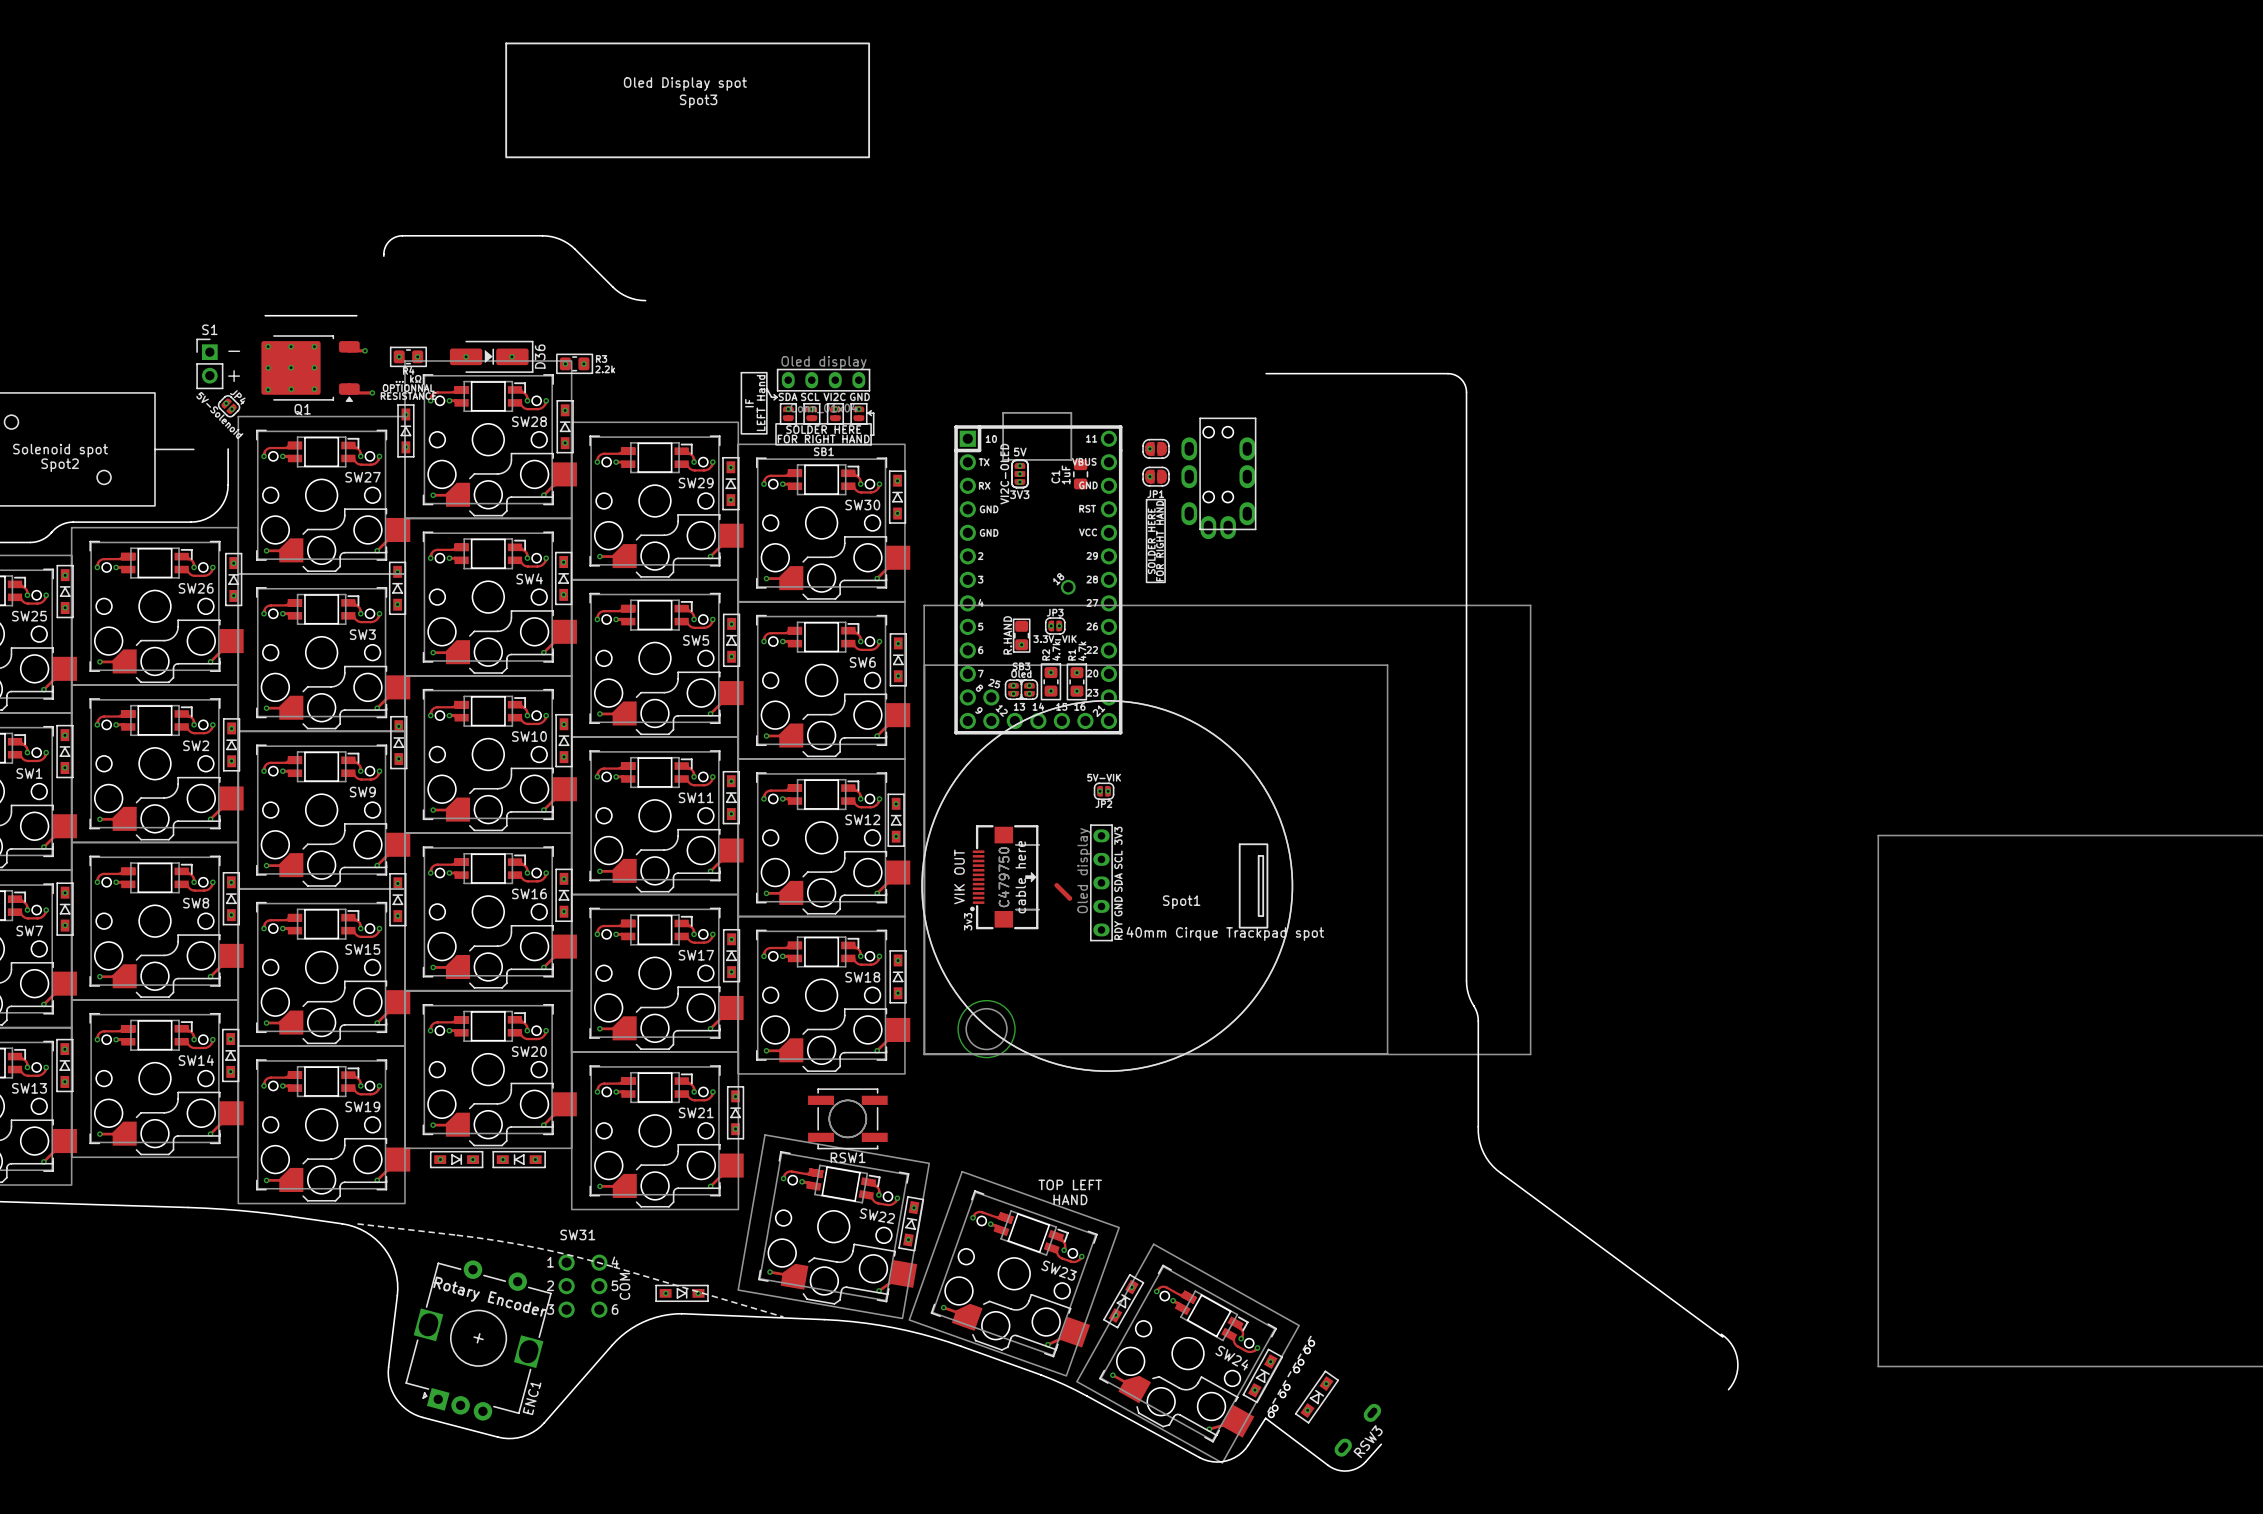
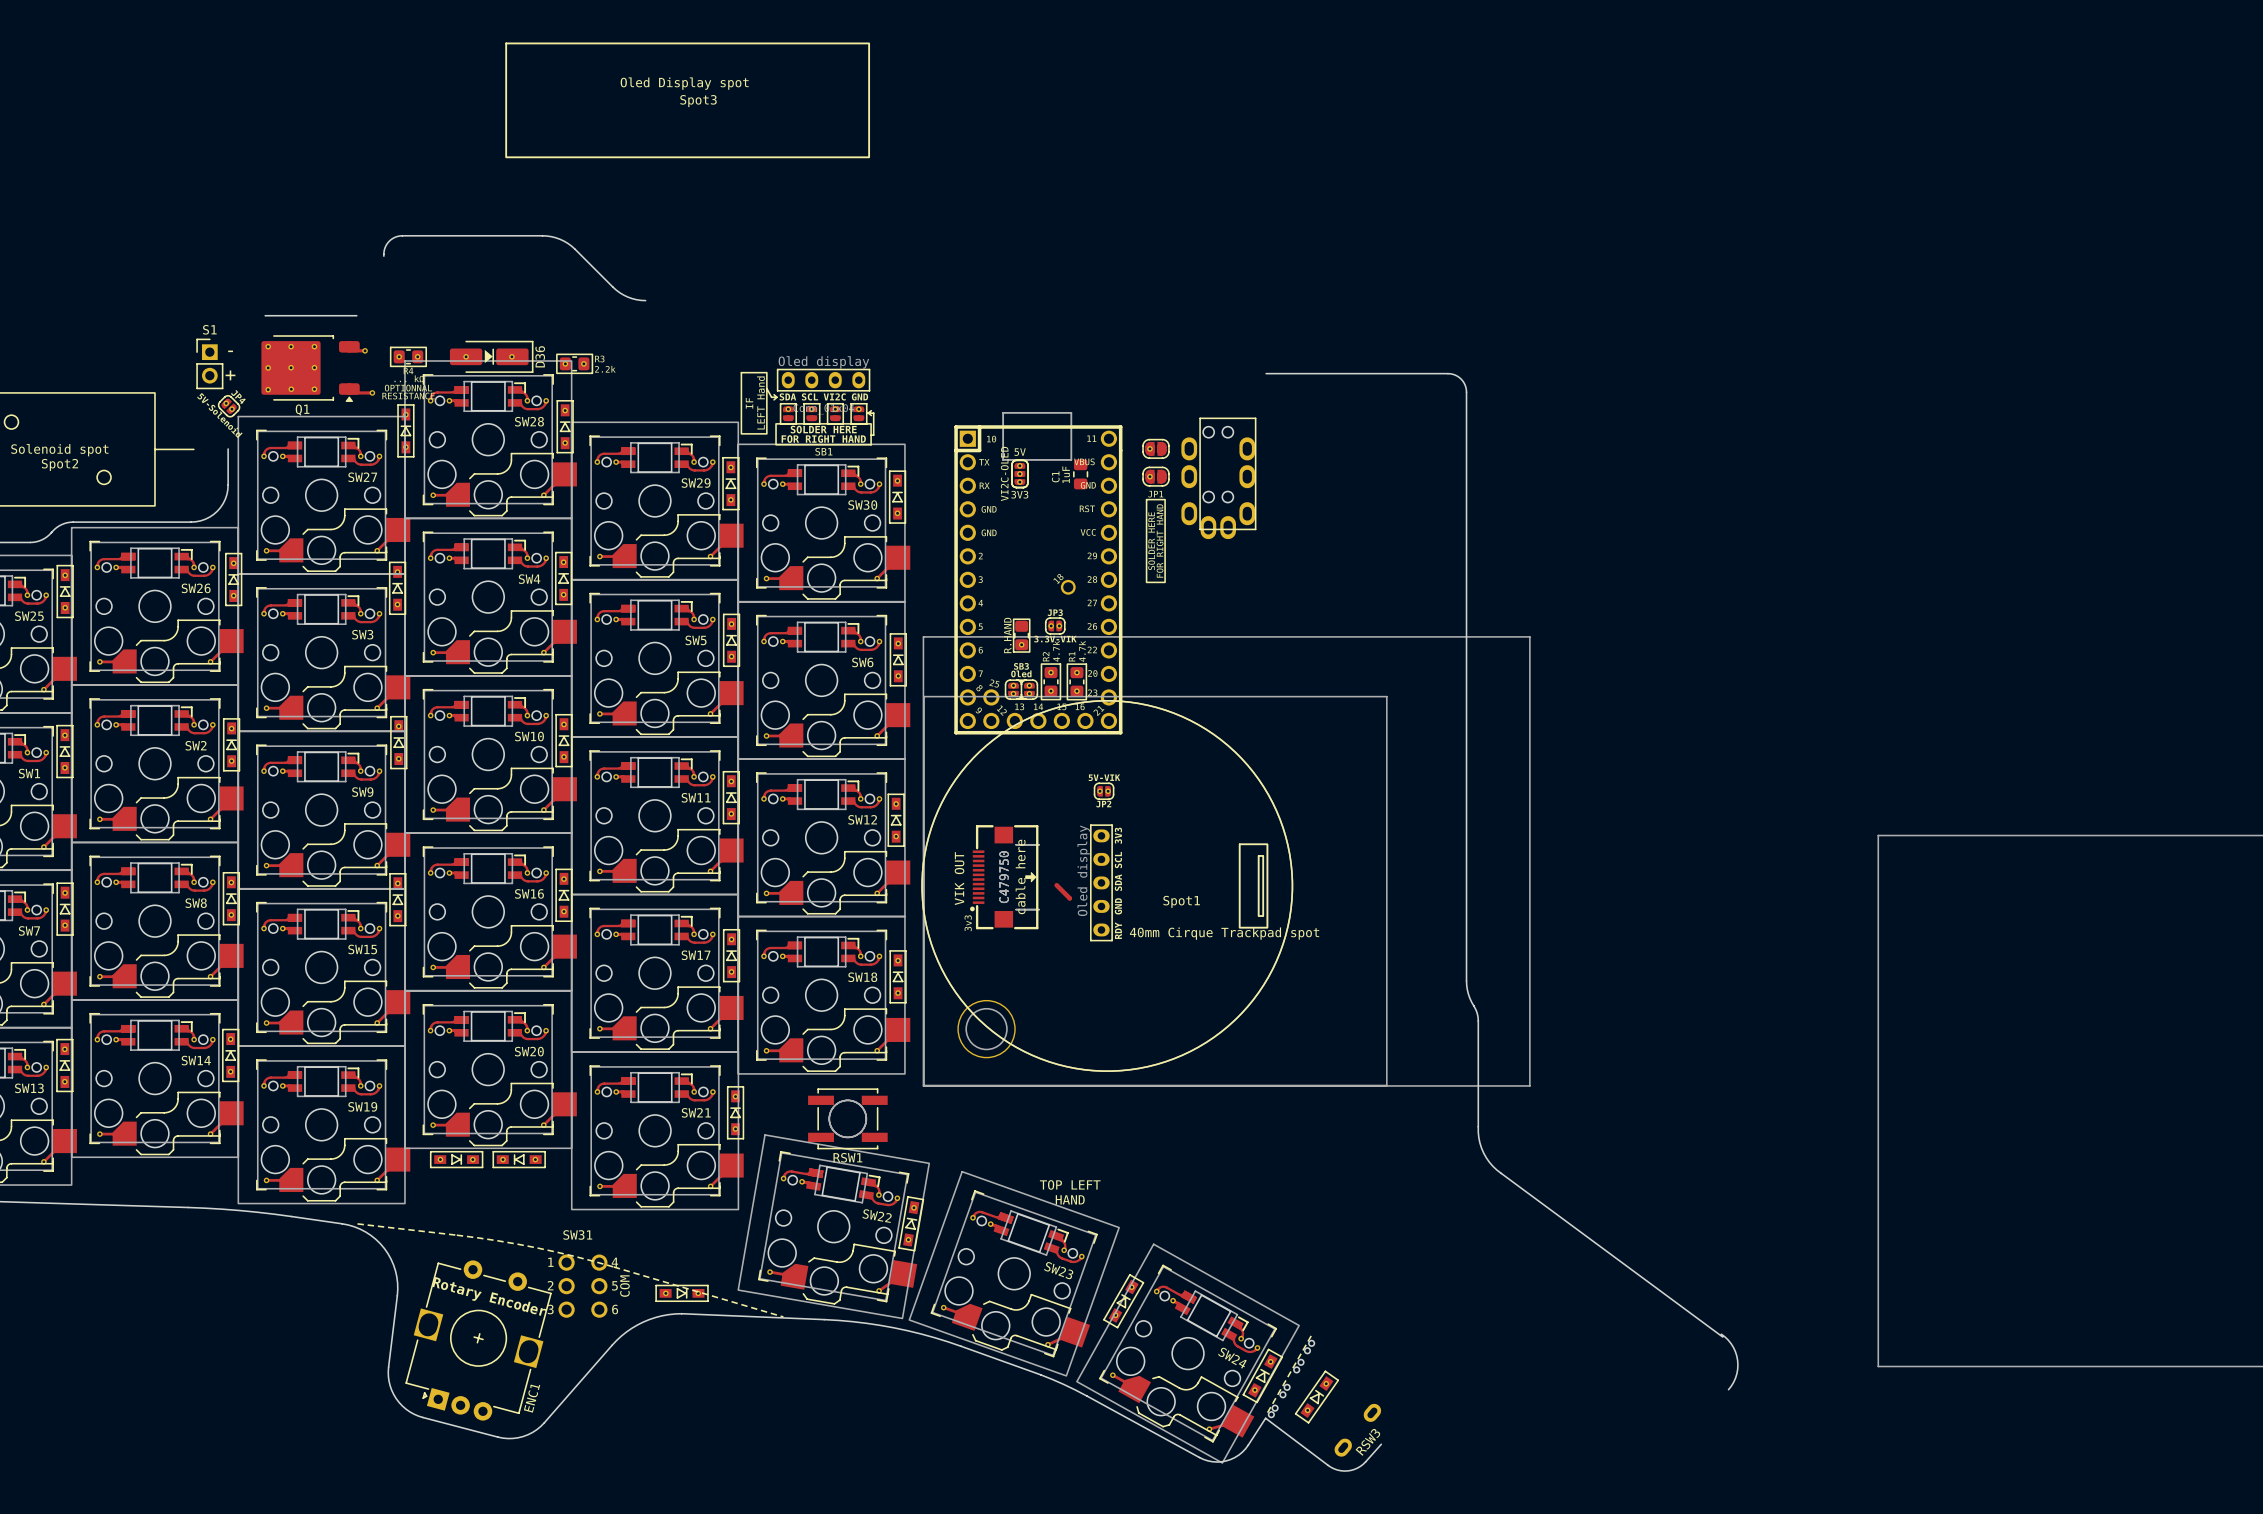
line: (924, 605) (1530, 605) (1530, 1054) (924, 1054) (924, 605) -> (923, 636) (1529, 636) (1529, 1085) (923, 1085) (923, 636)
line: (924, 665) (1387, 665) (1387, 1054) (924, 1054) (924, 665) -> (923, 696) (1386, 696) (1386, 1085) (923, 1085) (923, 696)

